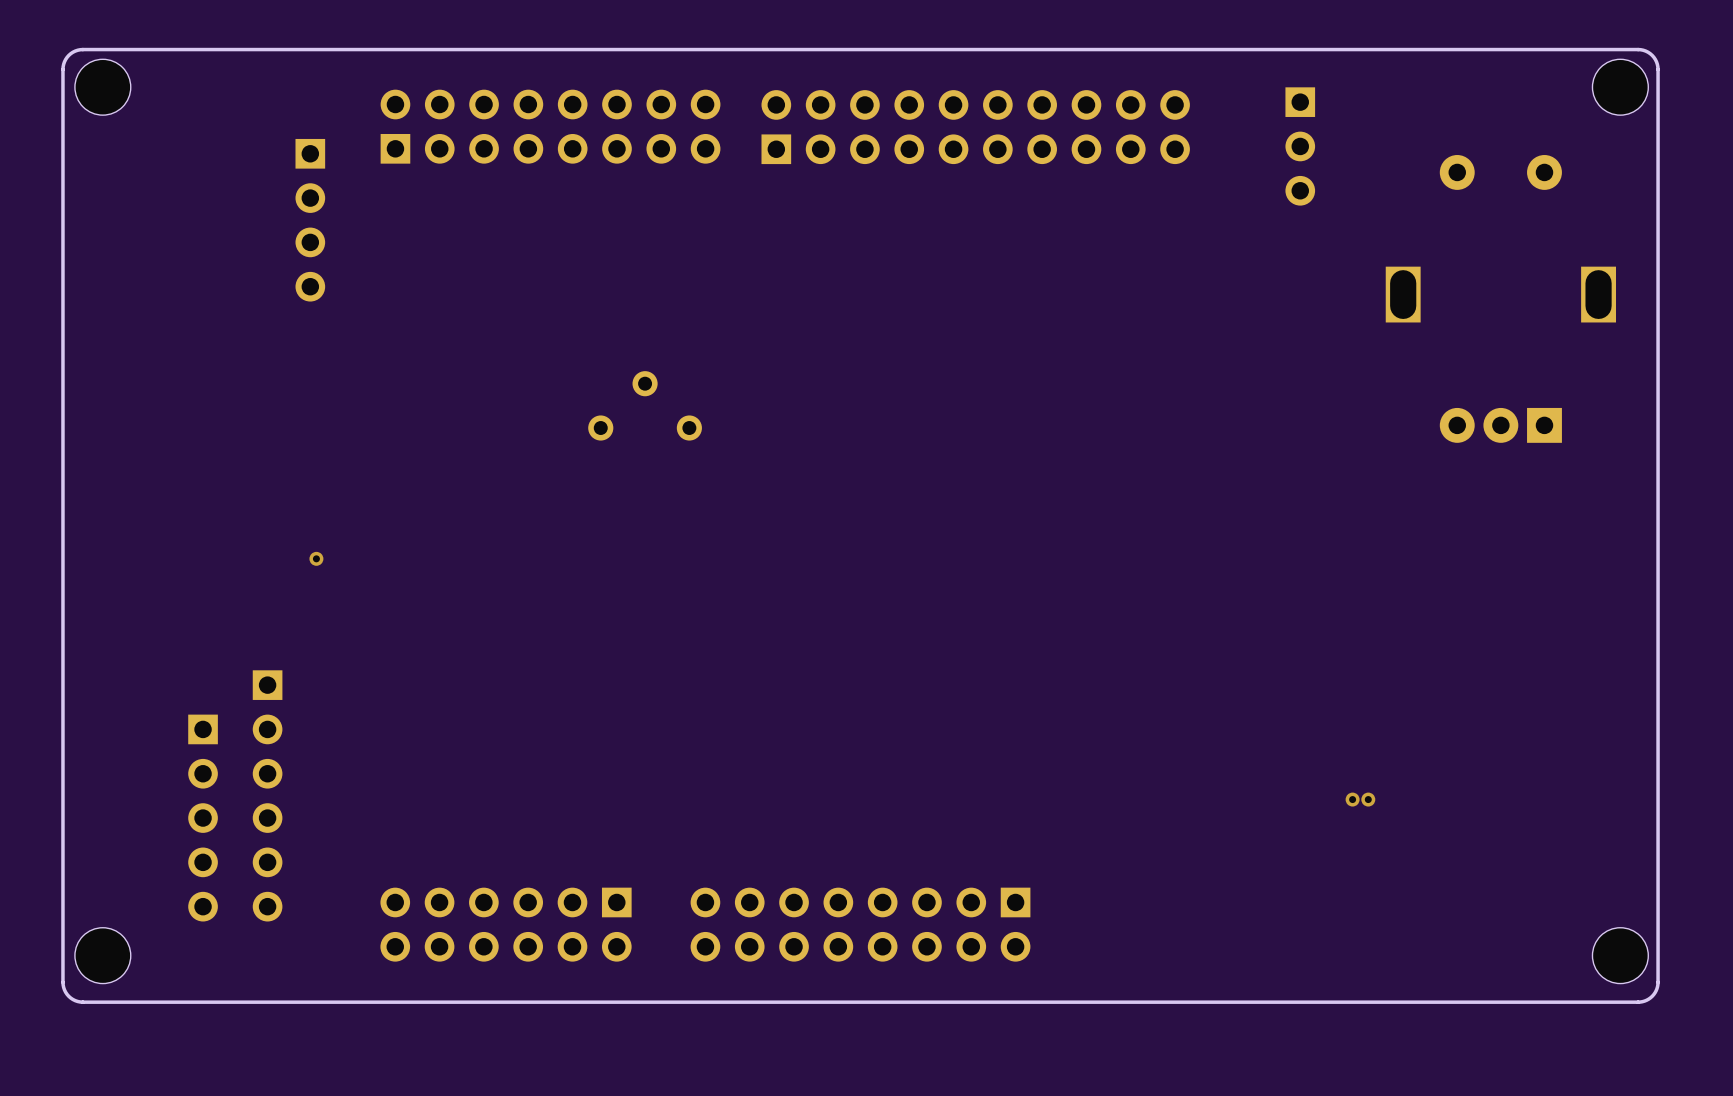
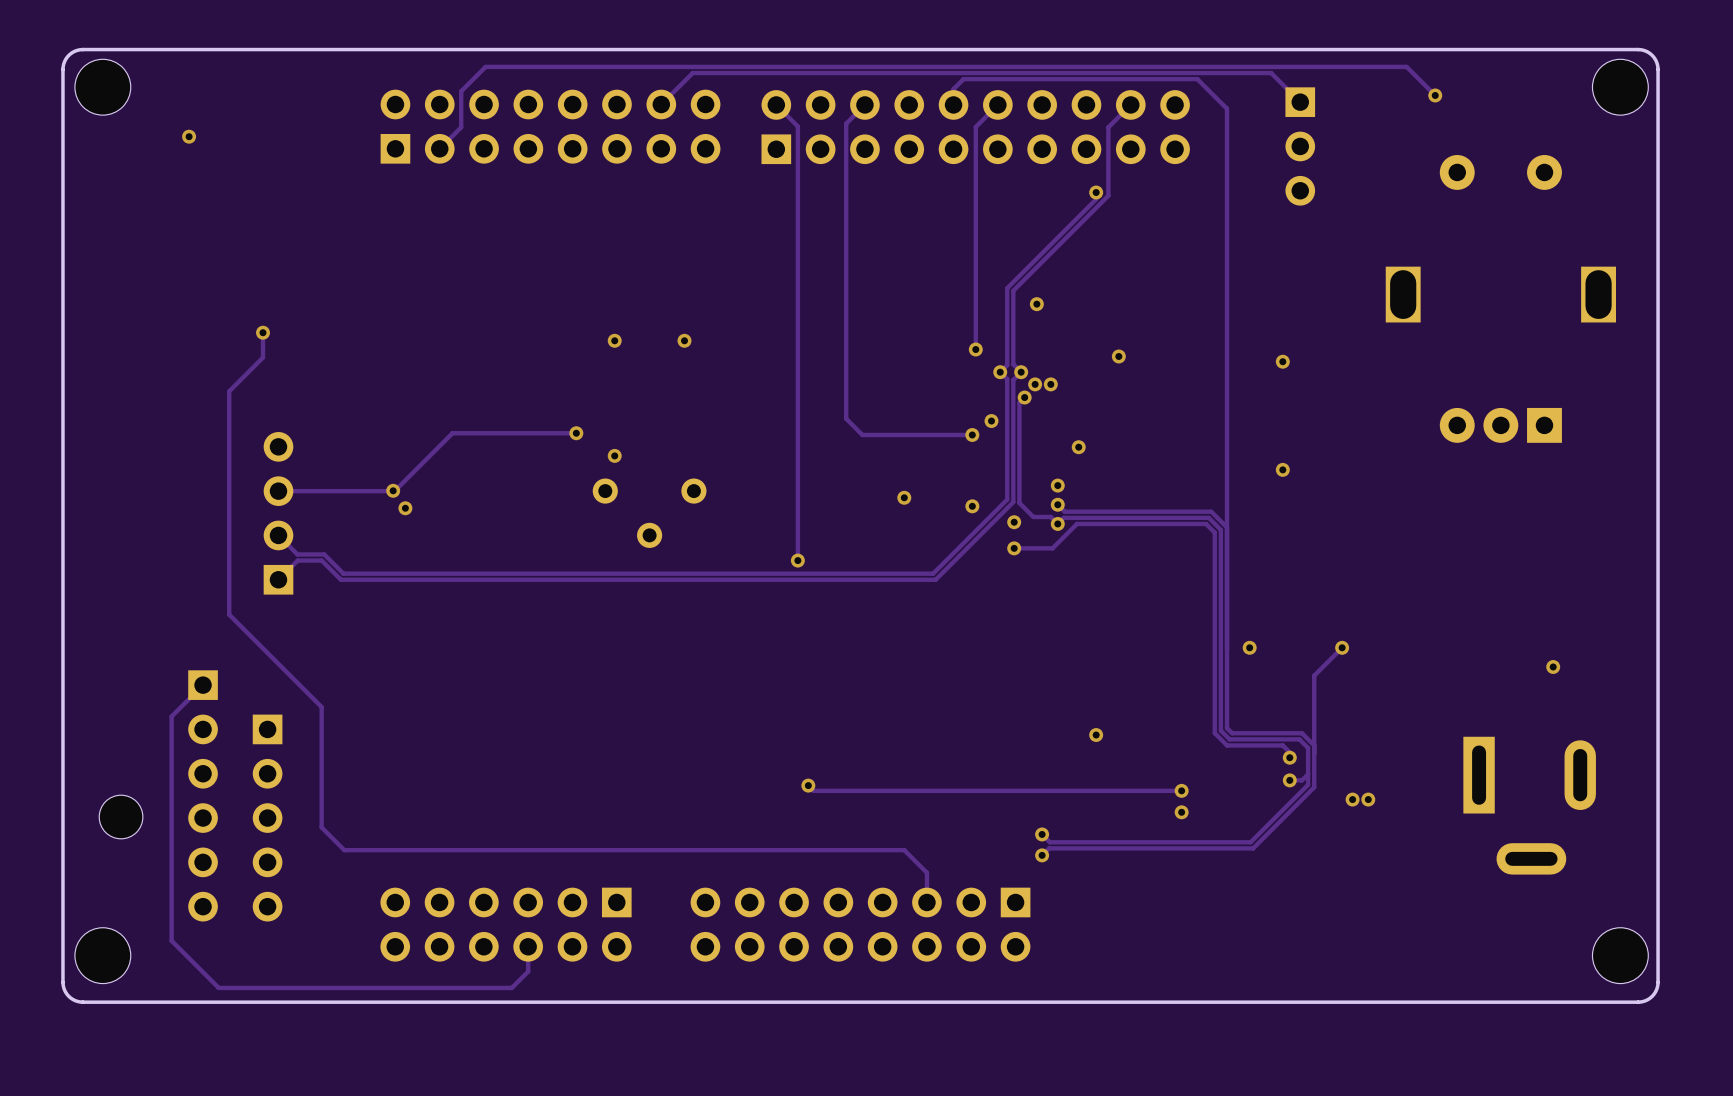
track: none -> (1435, 95) (1406, 66) (485, 66) (461, 91) (461, 127) (439, 148)
via: none -> (1435, 95)
track: none -> (1300, 102) (1271, 73) (692, 73) (661, 104)
track: none -> (776, 104) (797, 126) (797, 560)
track: none -> (864, 104) (846, 123) (846, 418) (862, 434) (972, 434)
track: none -> (953, 104) (953, 89) (963, 79) (1197, 79) (1227, 108) (1227, 728) (1232, 733) (1302, 733) (1314, 745)
track: none -> (997, 104) (975, 126) (975, 349)
track: none -> (1130, 104) (1108, 127) (1108, 195) (1013, 290) (1013, 364) (1021, 372) (1013, 380) (1013, 502) (935, 579) (340, 579) (321, 560) (297, 560) (278, 579)
via: none -> (189, 136)
track: none -> (1096, 192) (1096, 199) (1007, 288) (1007, 365) (1000, 372) (1007, 379) (1007, 499) (933, 573) (343, 573) (324, 554) (297, 554) (278, 535)
via: none -> (1096, 192)
part rotation: 0° (310, 220) -> 180° (278, 513)
part position: (310, 220) -> (278, 513)
via: none -> (1036, 304)
track: none -> (263, 332) (263, 357) (229, 391) (229, 614) (321, 707) (321, 827) (344, 850) (904, 850) (926, 872) (926, 902)
via: none -> (263, 332)
via: none -> (614, 340)
via: none -> (684, 340)
via: none -> (975, 349)
via: none -> (1118, 356)
via: none -> (1282, 361)
via: none -> (1000, 372)
via: none -> (1021, 372)
via: none -> (1035, 384)
via: none -> (1050, 384)
track: none -> (1024, 397) (1019, 402) (1019, 503) (1033, 516) (1050, 516) (1057, 523) (1063, 517) (1208, 517) (1220, 529) (1220, 730) (1229, 739) (1299, 739) (1308, 748) (1308, 784) (1250, 842) (1049, 842) (1042, 834)
via: none -> (1024, 397)
part rotation: 0° (645, 405) -> 180° (649, 513)
part position: (645, 405) -> (649, 513)
via: none -> (991, 421)
track: none -> (576, 433) (452, 433) (394, 491) (278, 491)
via: none -> (576, 433)
via: none -> (972, 434)
via: none -> (1078, 447)
via: none -> (614, 455)
via: none -> (1282, 469)
via: none -> (1057, 485)
via: none -> (393, 490)
via: none -> (904, 497)
track: none -> (1057, 504) (1064, 511) (1211, 511) (1227, 527)
via: none -> (1057, 504)
via: none -> (972, 506)
via: none -> (405, 508)
via: none -> (1014, 522)
via: none -> (1057, 523)
track: none -> (1014, 548) (1052, 548) (1076, 523) (1206, 523) (1214, 532) (1214, 733) (1227, 745) (1282, 745) (1289, 752) (1289, 757)
via: none -> (1014, 548)
via: (316, 558) -> none
via: none -> (797, 560)
via: none -> (1249, 647)
track: none -> (1342, 647) (1314, 675) (1314, 787) (1253, 848) (1049, 848) (1042, 855)
via: none -> (1342, 647)
via: none -> (1553, 666)
track: none -> (203, 685) (171, 716) (171, 940) (218, 987) (511, 987) (528, 971) (528, 946)
via: none -> (1096, 735)
via: none -> (1289, 757)
track: none -> (1308, 774) (1302, 780) (1289, 780)
via: none -> (1289, 780)
track: none -> (808, 785) (813, 790) (1181, 790)
via: none -> (808, 785)
via: none -> (1181, 790)
part position: (267, 795) -> (203, 795)
part: none -> (1529, 805)
via: none -> (1181, 812)
part: none -> (121, 817)
part position: (203, 818) -> (267, 818)
via: none -> (1042, 834)
via: none -> (1042, 855)

